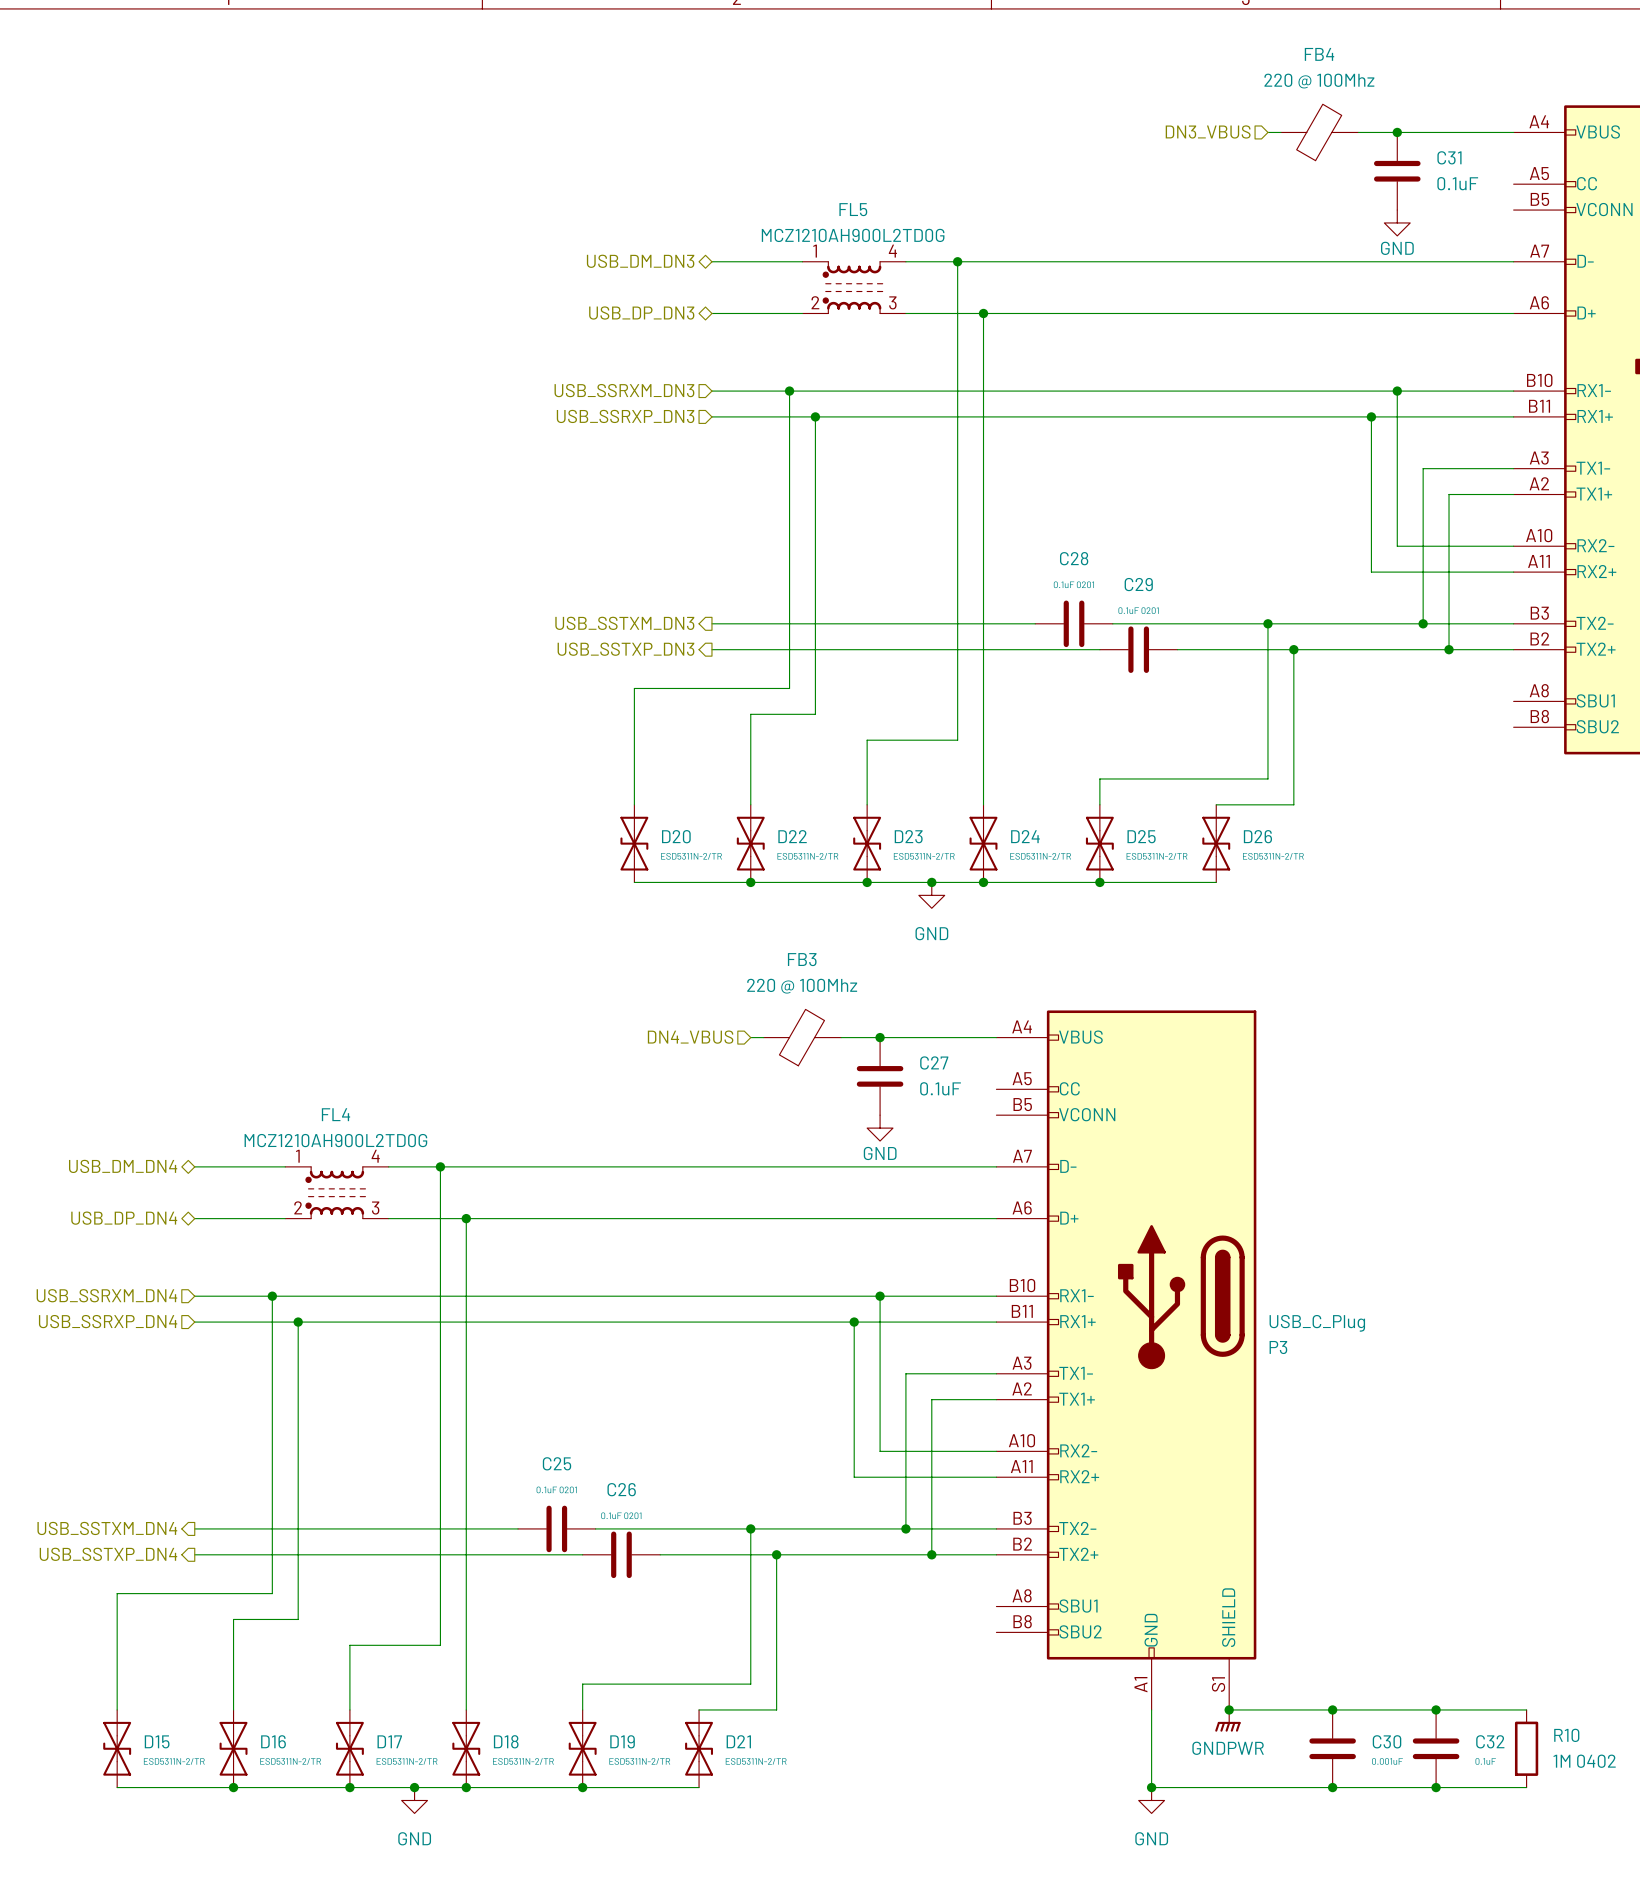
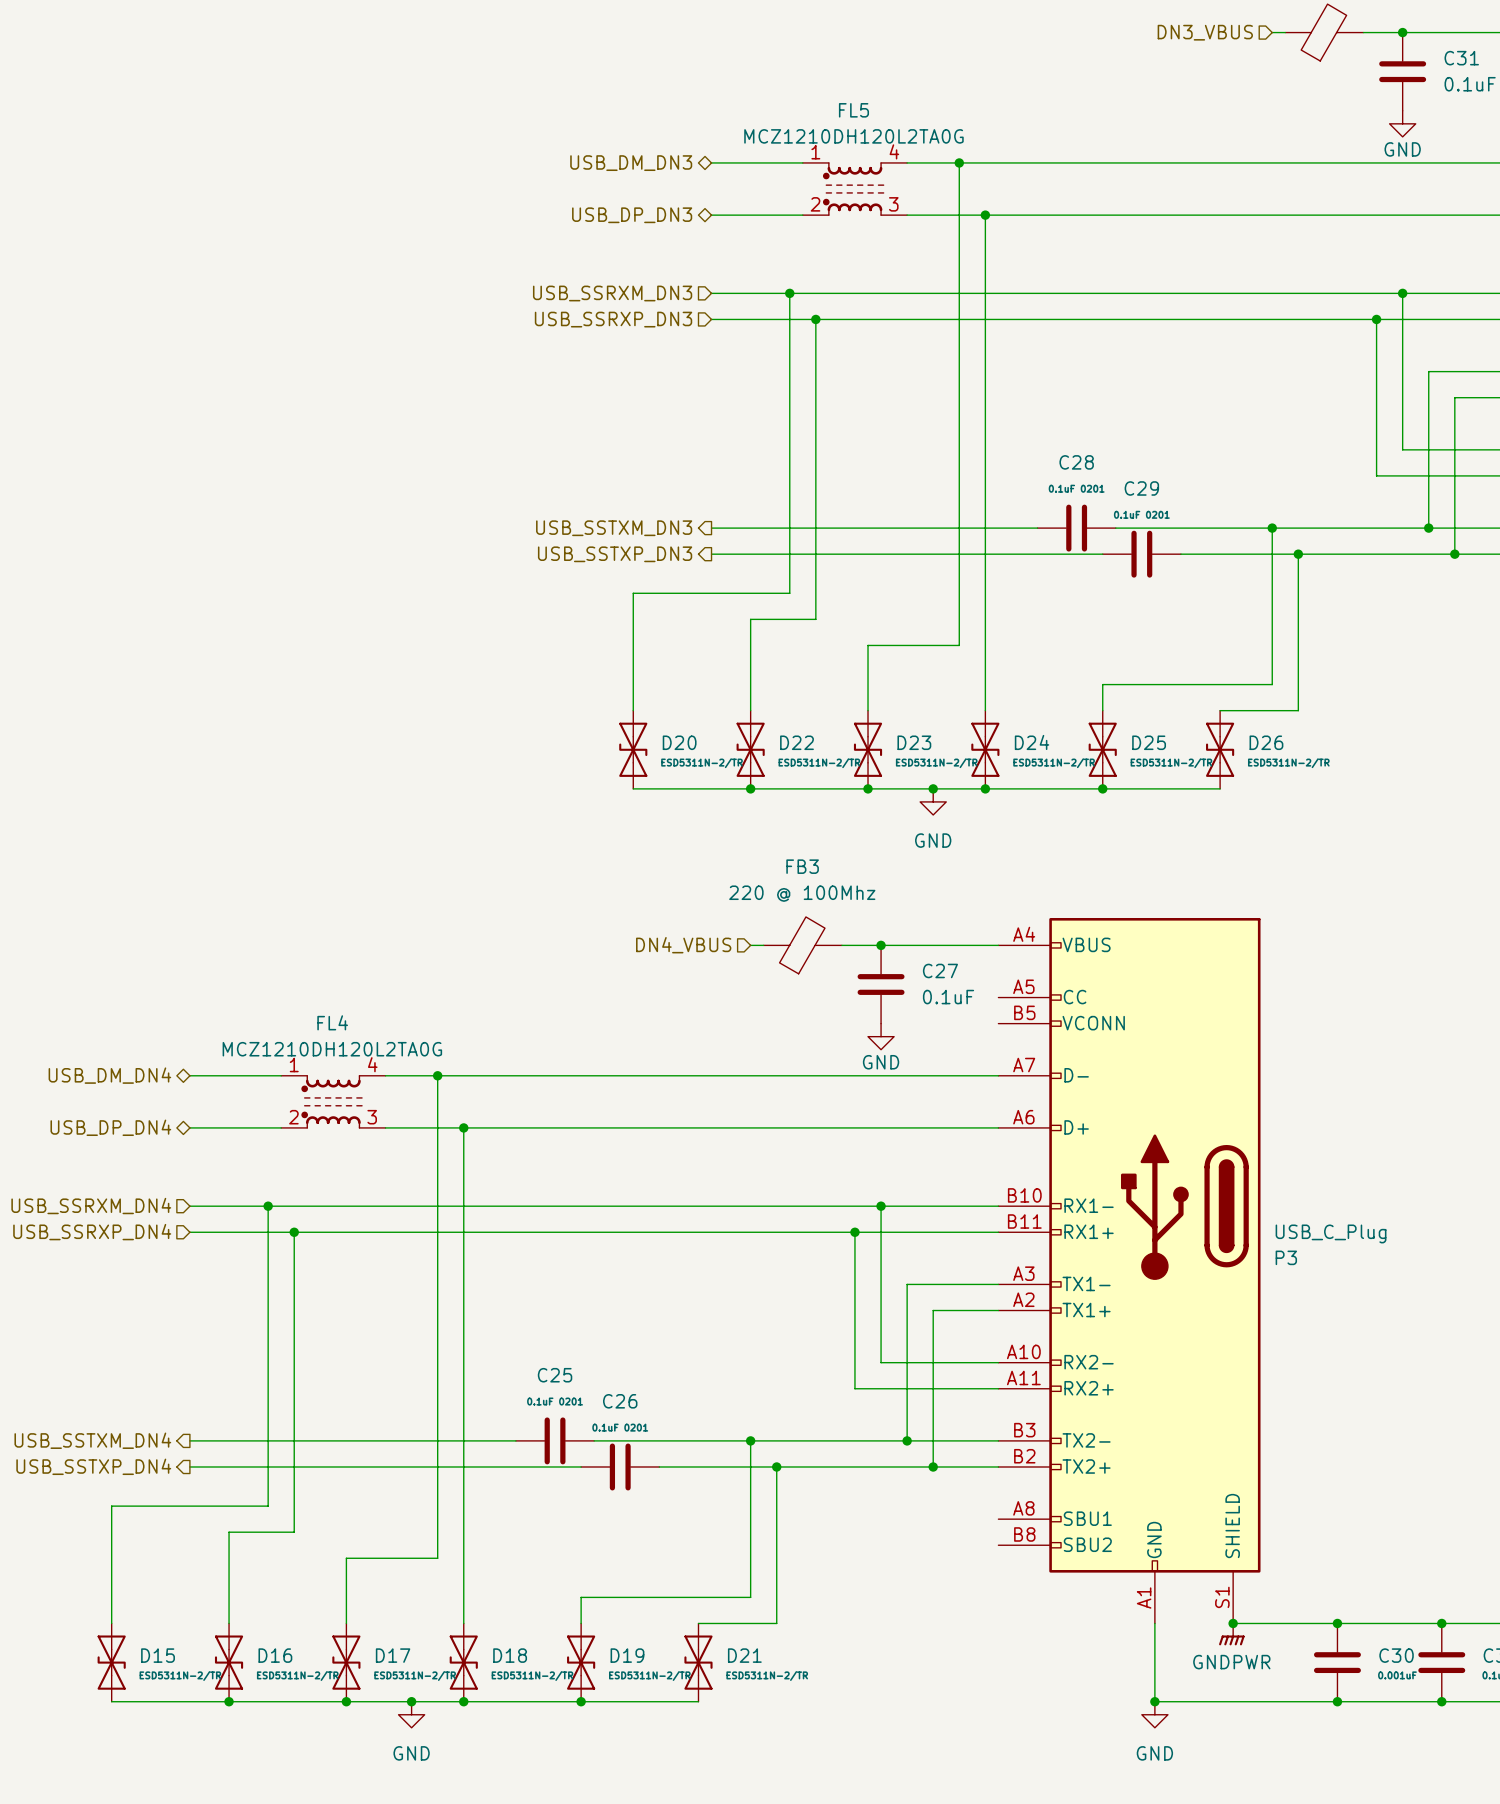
FL5 value: MCZ1210AH900L2TD0G (853, 235) -> MCZ1210DH120L2TA0G (853, 136)
FL4 value: MCZ1210AH900L2TD0G (335, 1140) -> MCZ1210DH120L2TA0G (332, 1049)

